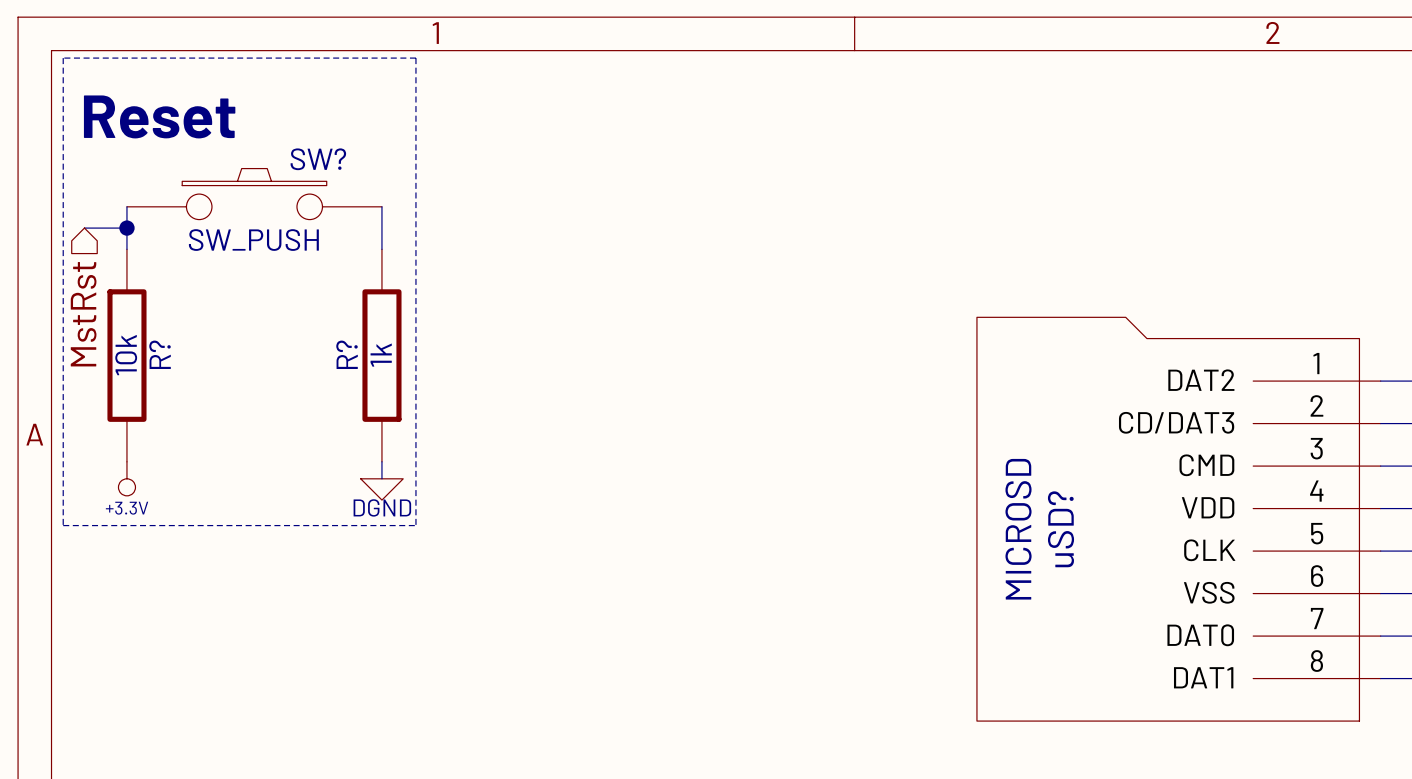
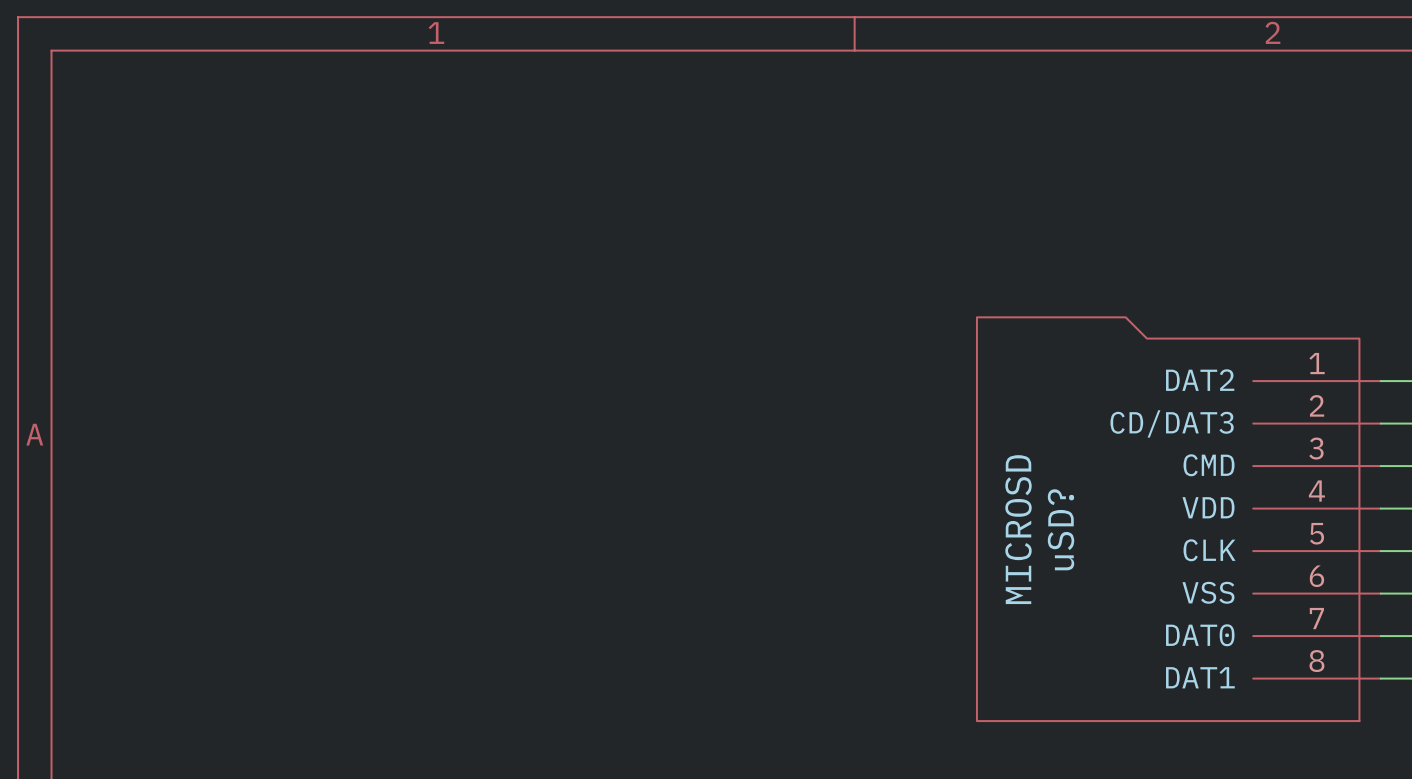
line: (63, 58) (415, 58) (415, 525) (63, 525) (63, 58) -> none
text: Reset (159, 116) -> none
SW?: SW_PUSH (254, 194) -> none
wire: (126, 206) (126, 249) -> none
wire: (381, 206) (381, 249) -> none
wire: (84, 228) (126, 228) -> none
junction: (126, 228) -> none
hierarchical label: MstRst (83, 314) -> none
R?: 10k (126, 355) -> none
R?: 1k (381, 355) -> none
wire: (381, 461) (381, 478) -> none
power symbol: +3.3V (126, 478) -> none
power symbol: DGND (381, 489) -> none

